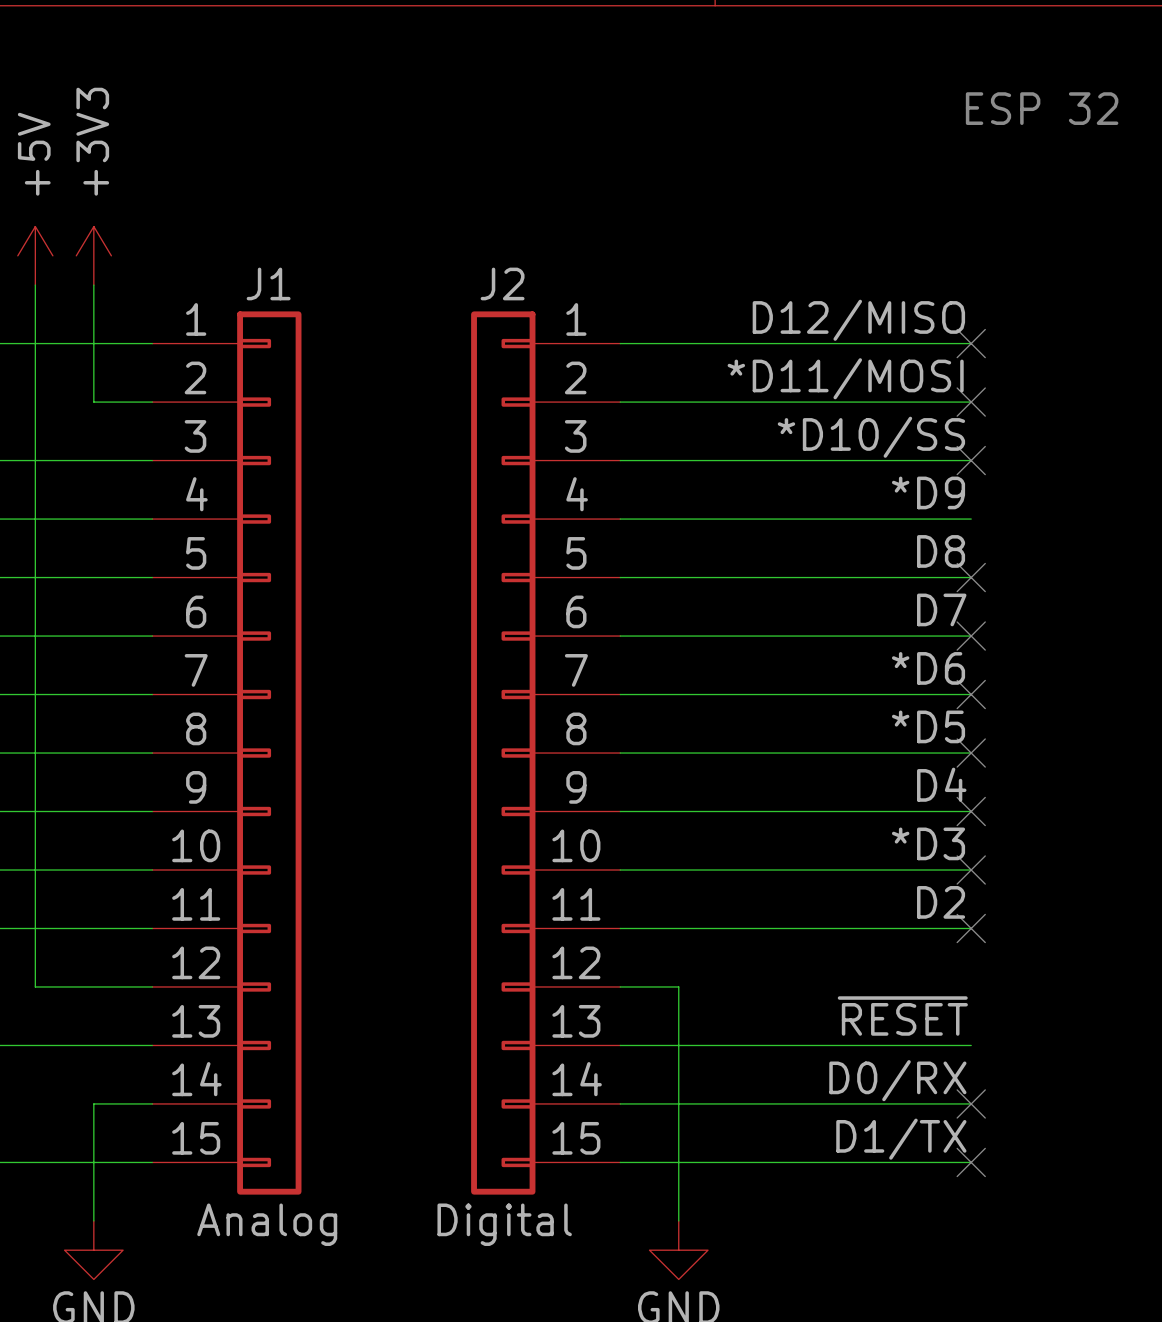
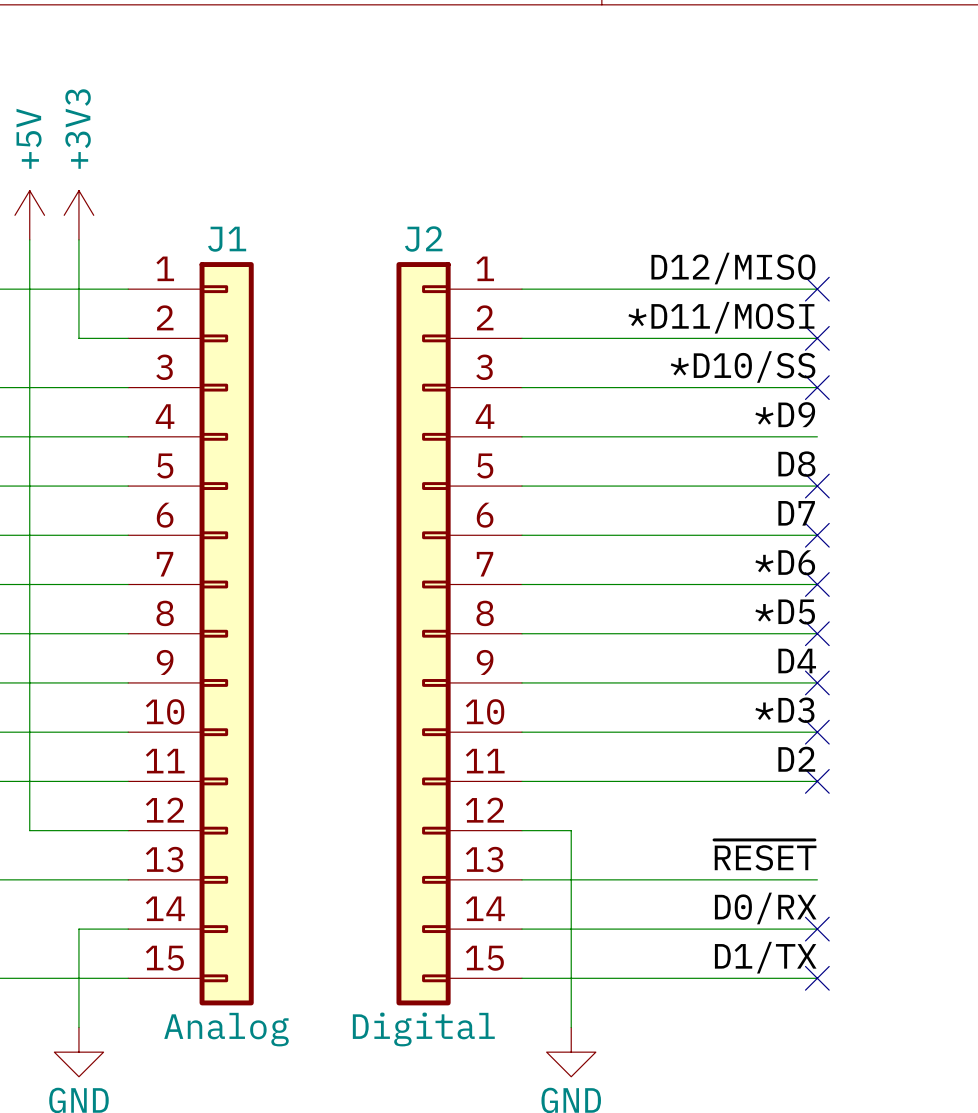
text: ESP 32 (1042, 108) -> none

